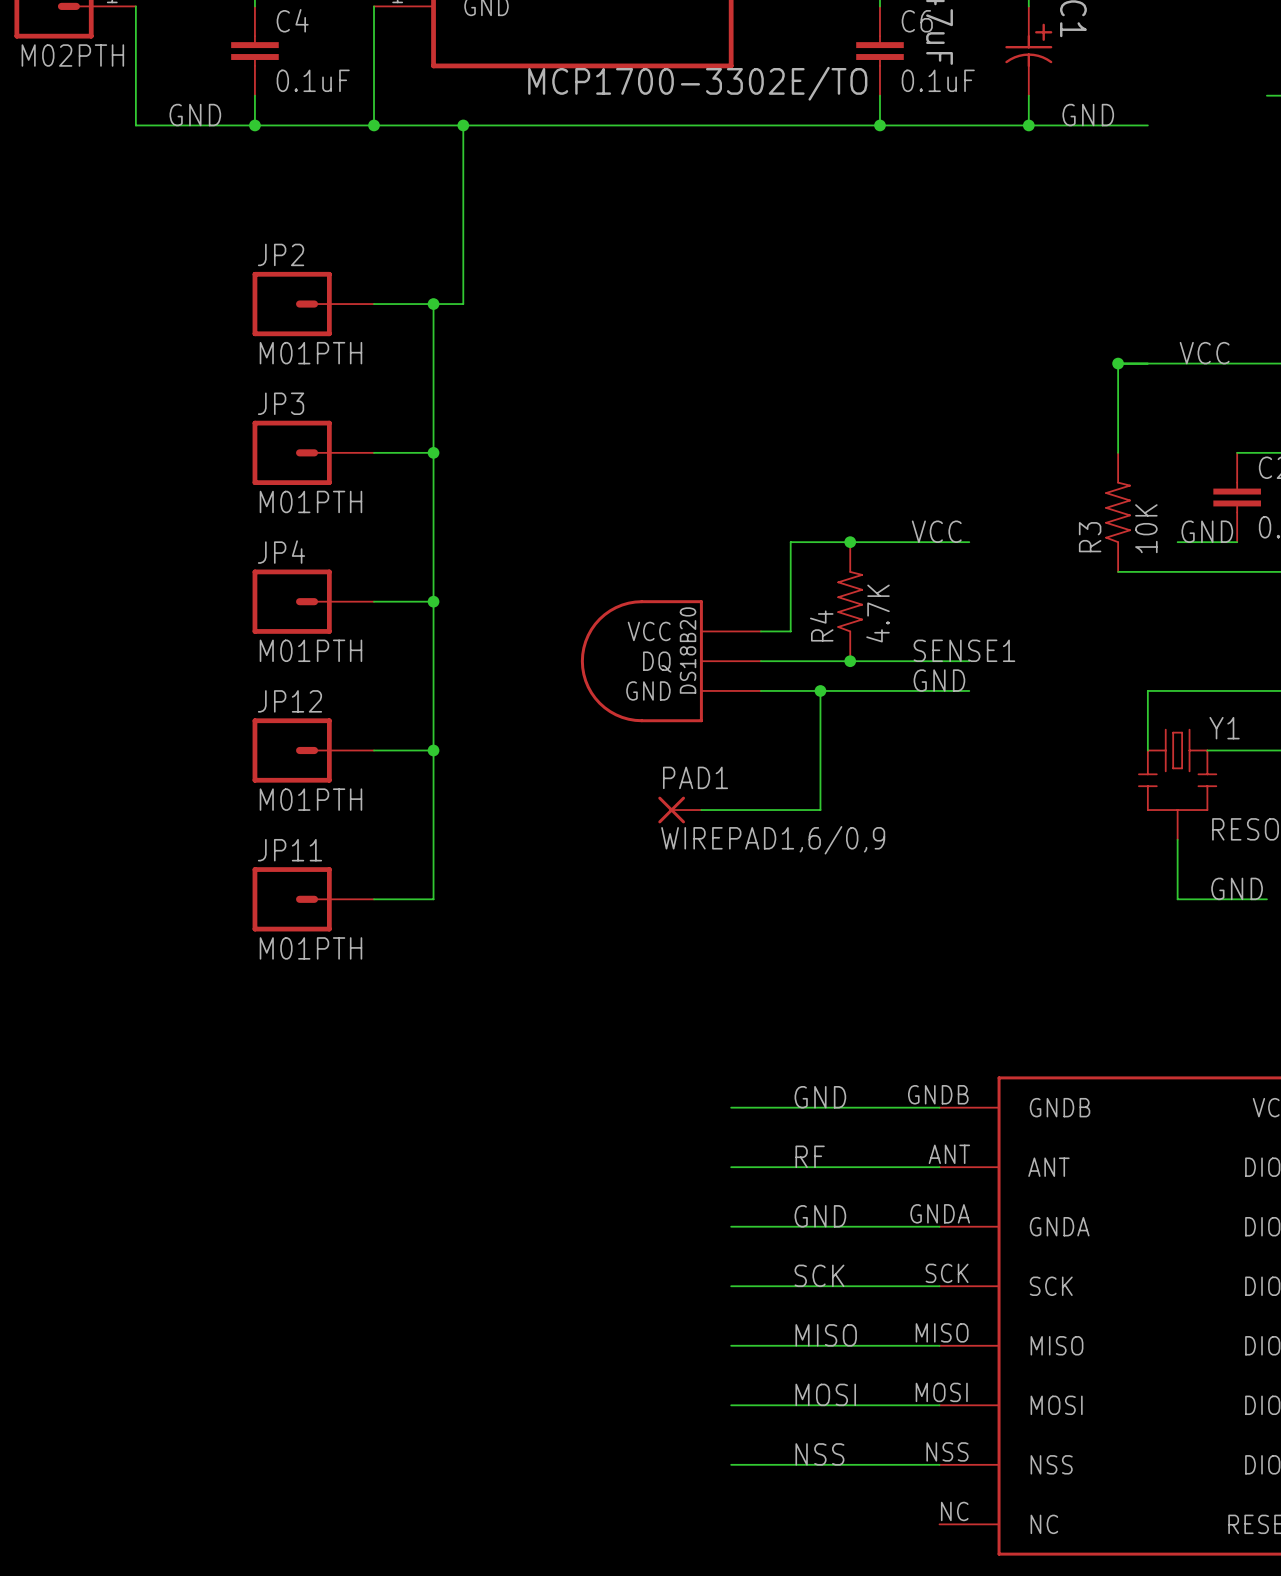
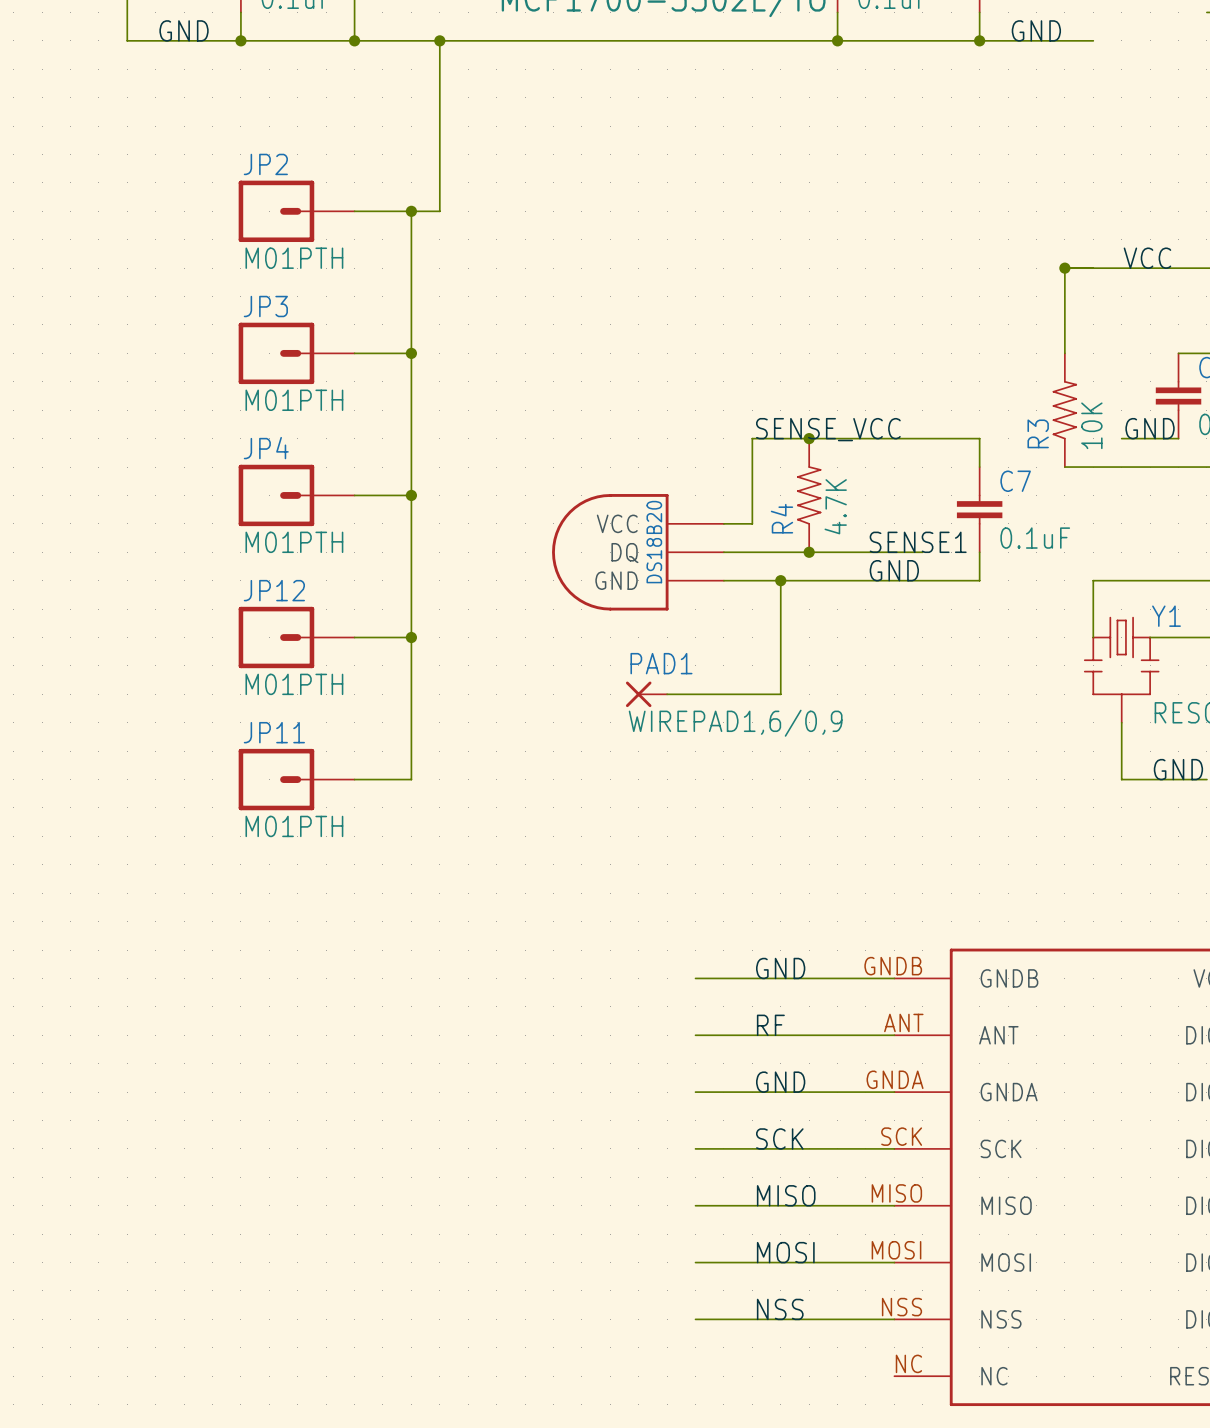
label: VCC (936, 531) -> none
label: none -> SENSE_VCC (828, 429)
wire: none -> (922, 438) (979, 438) (979, 467)
C7: none -> 0.1uF (979, 509)
wire: none -> (979, 552) (979, 580) (922, 580)

